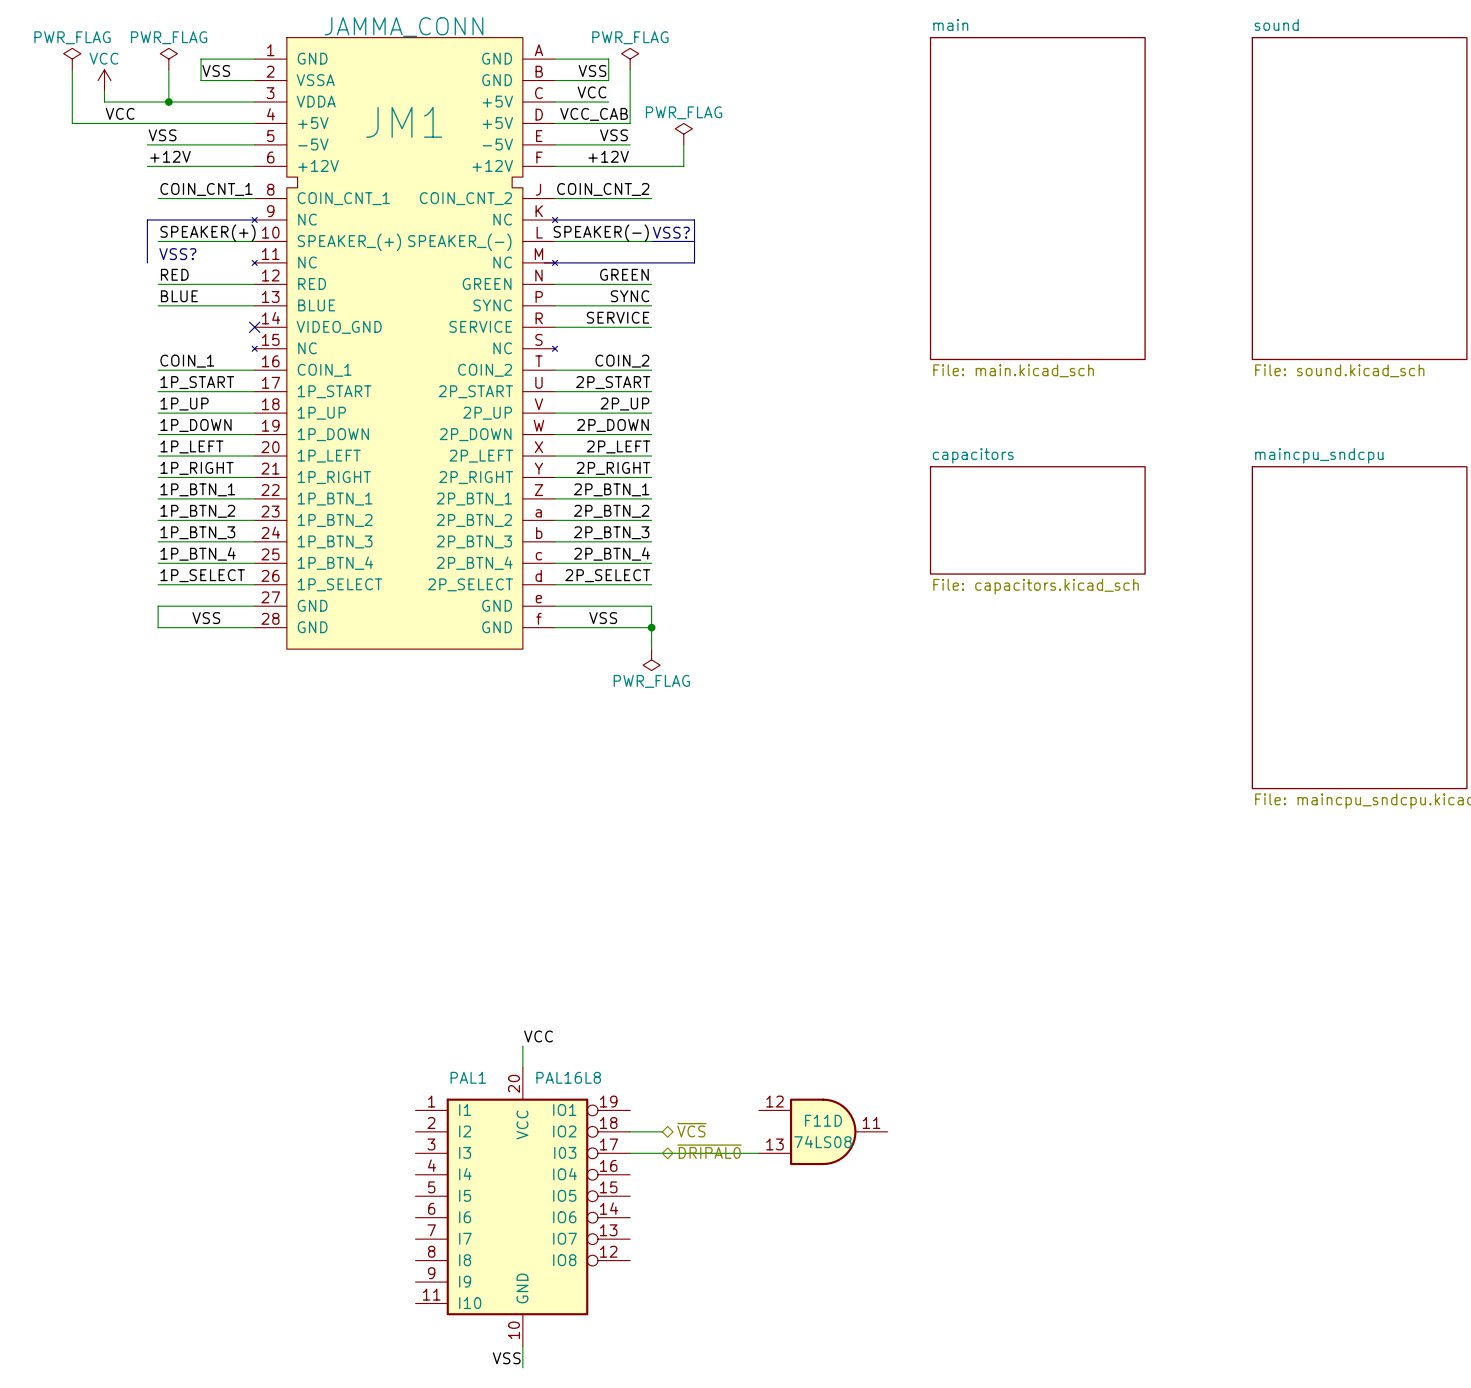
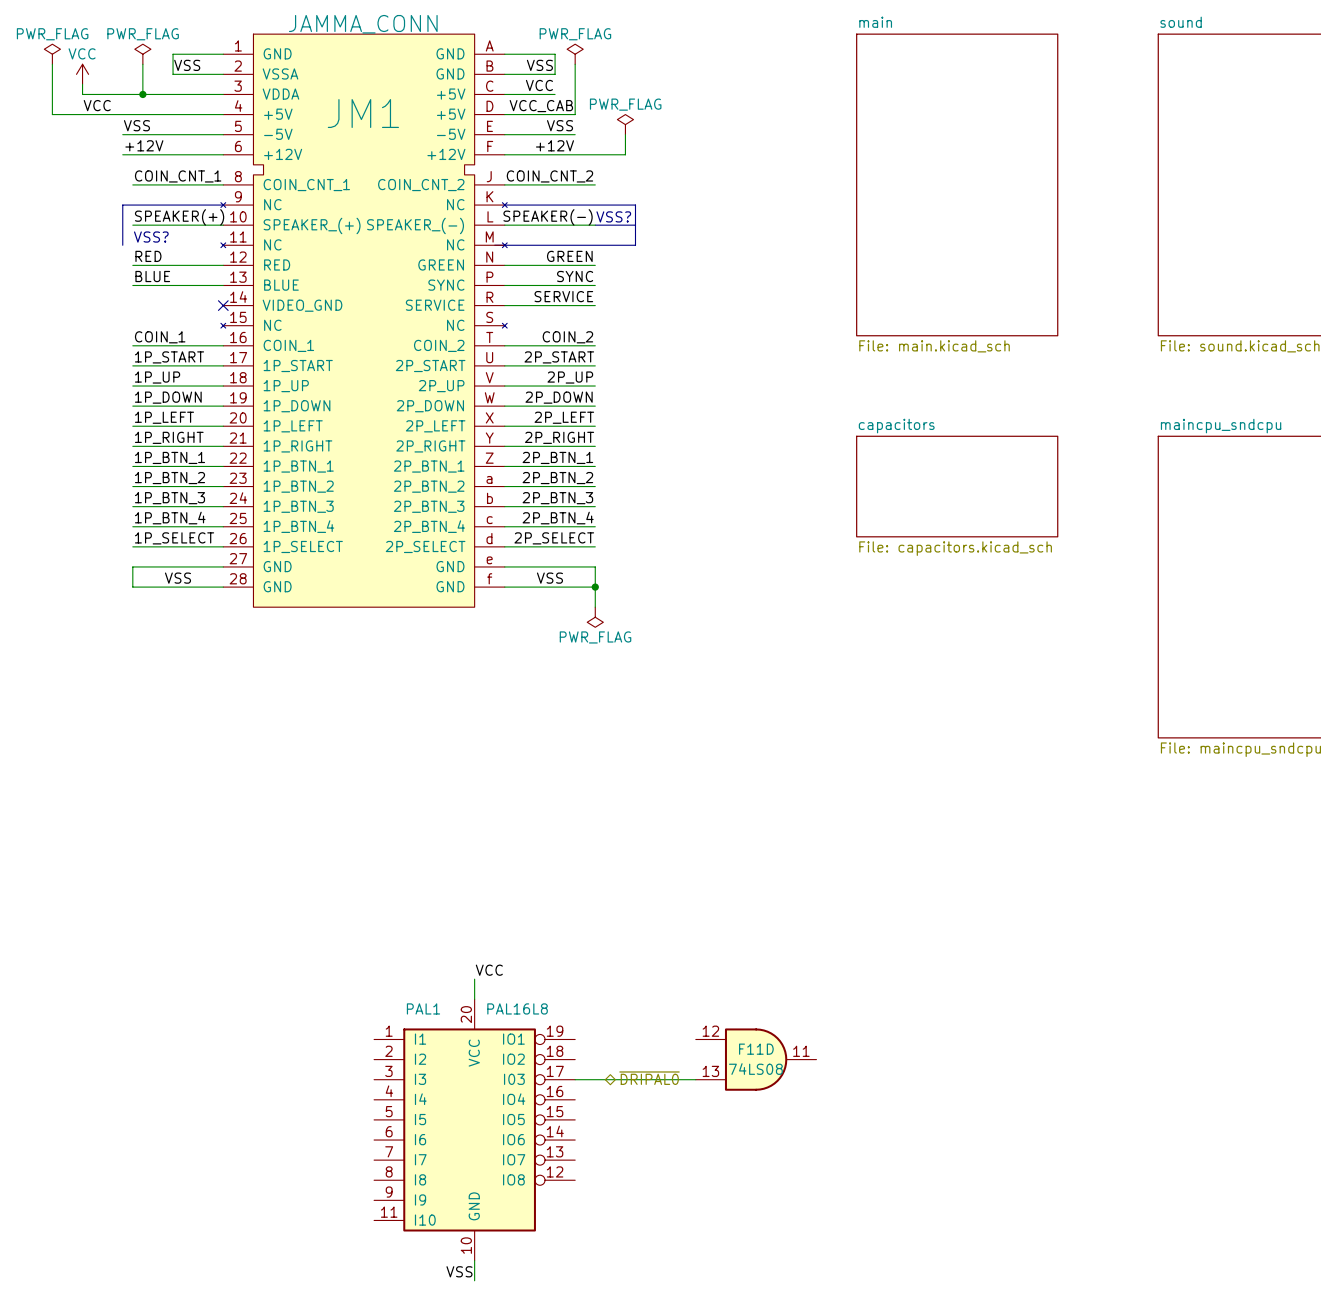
hierarchical label: ~{VCS} (691, 1130) -> none
wire: (630, 1131) (662, 1131) -> none

